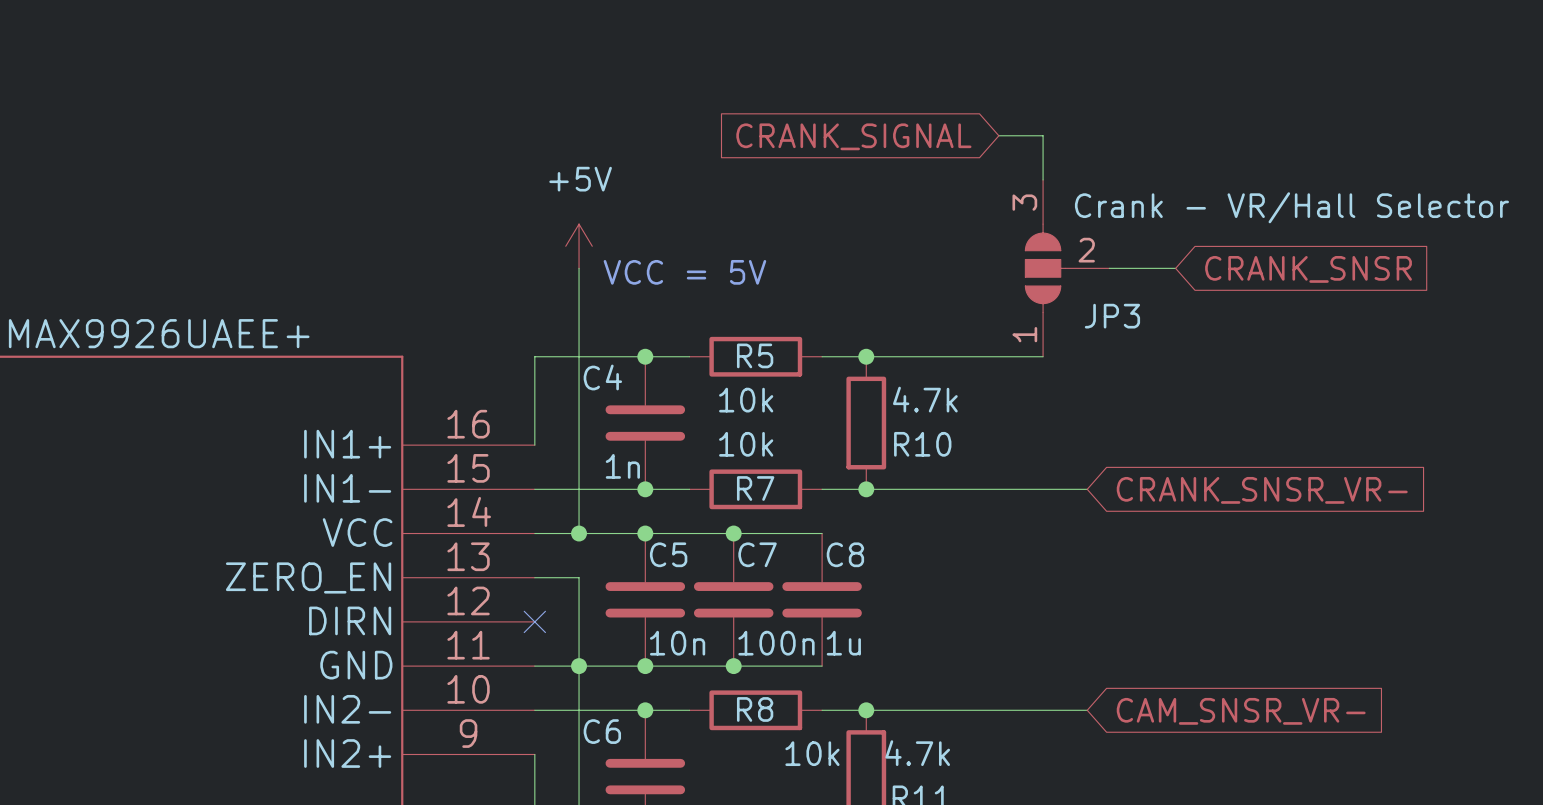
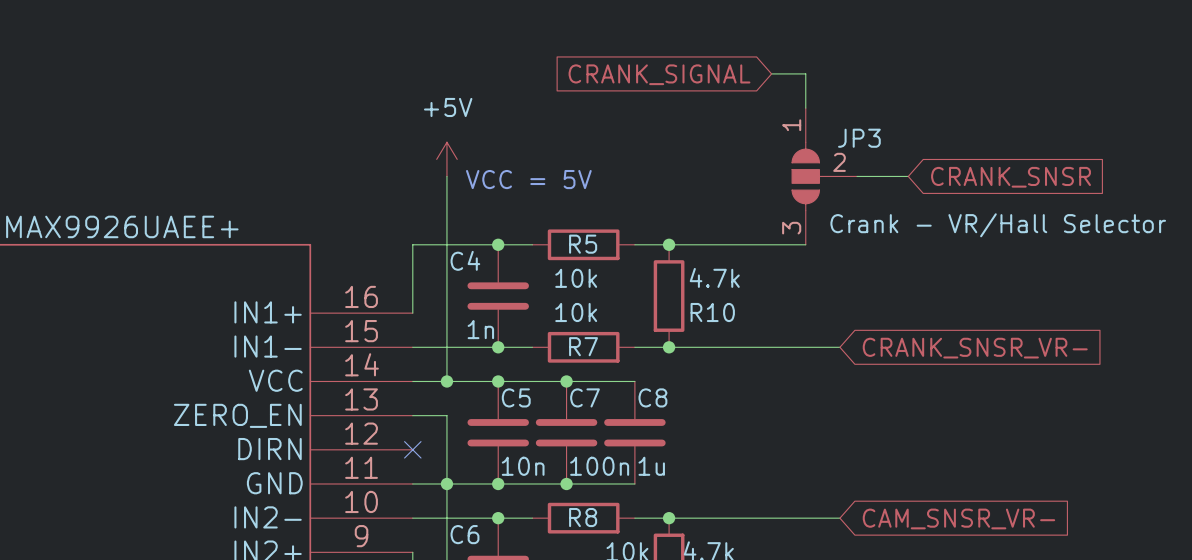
JP3 flip: as is (1045, 268) -> up-down (807, 176)

